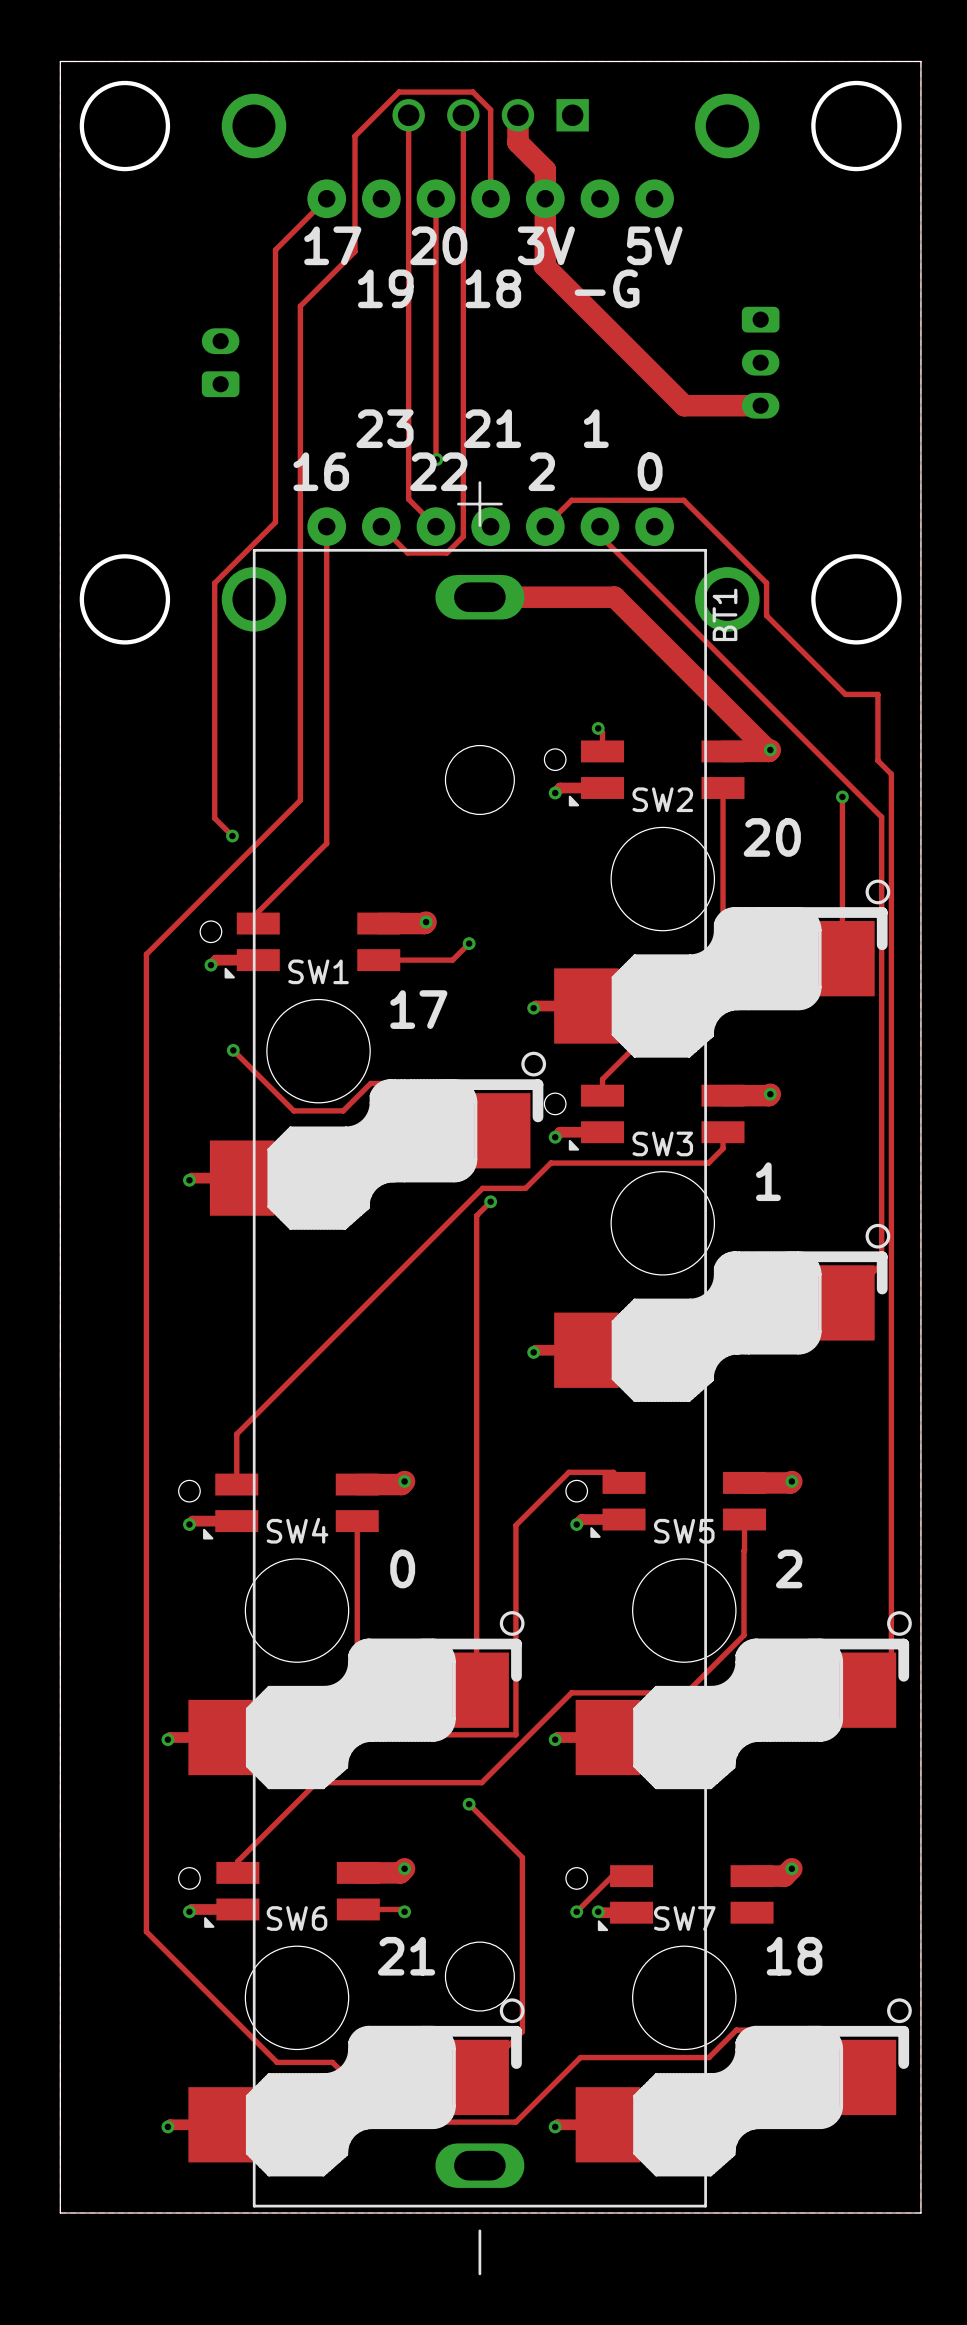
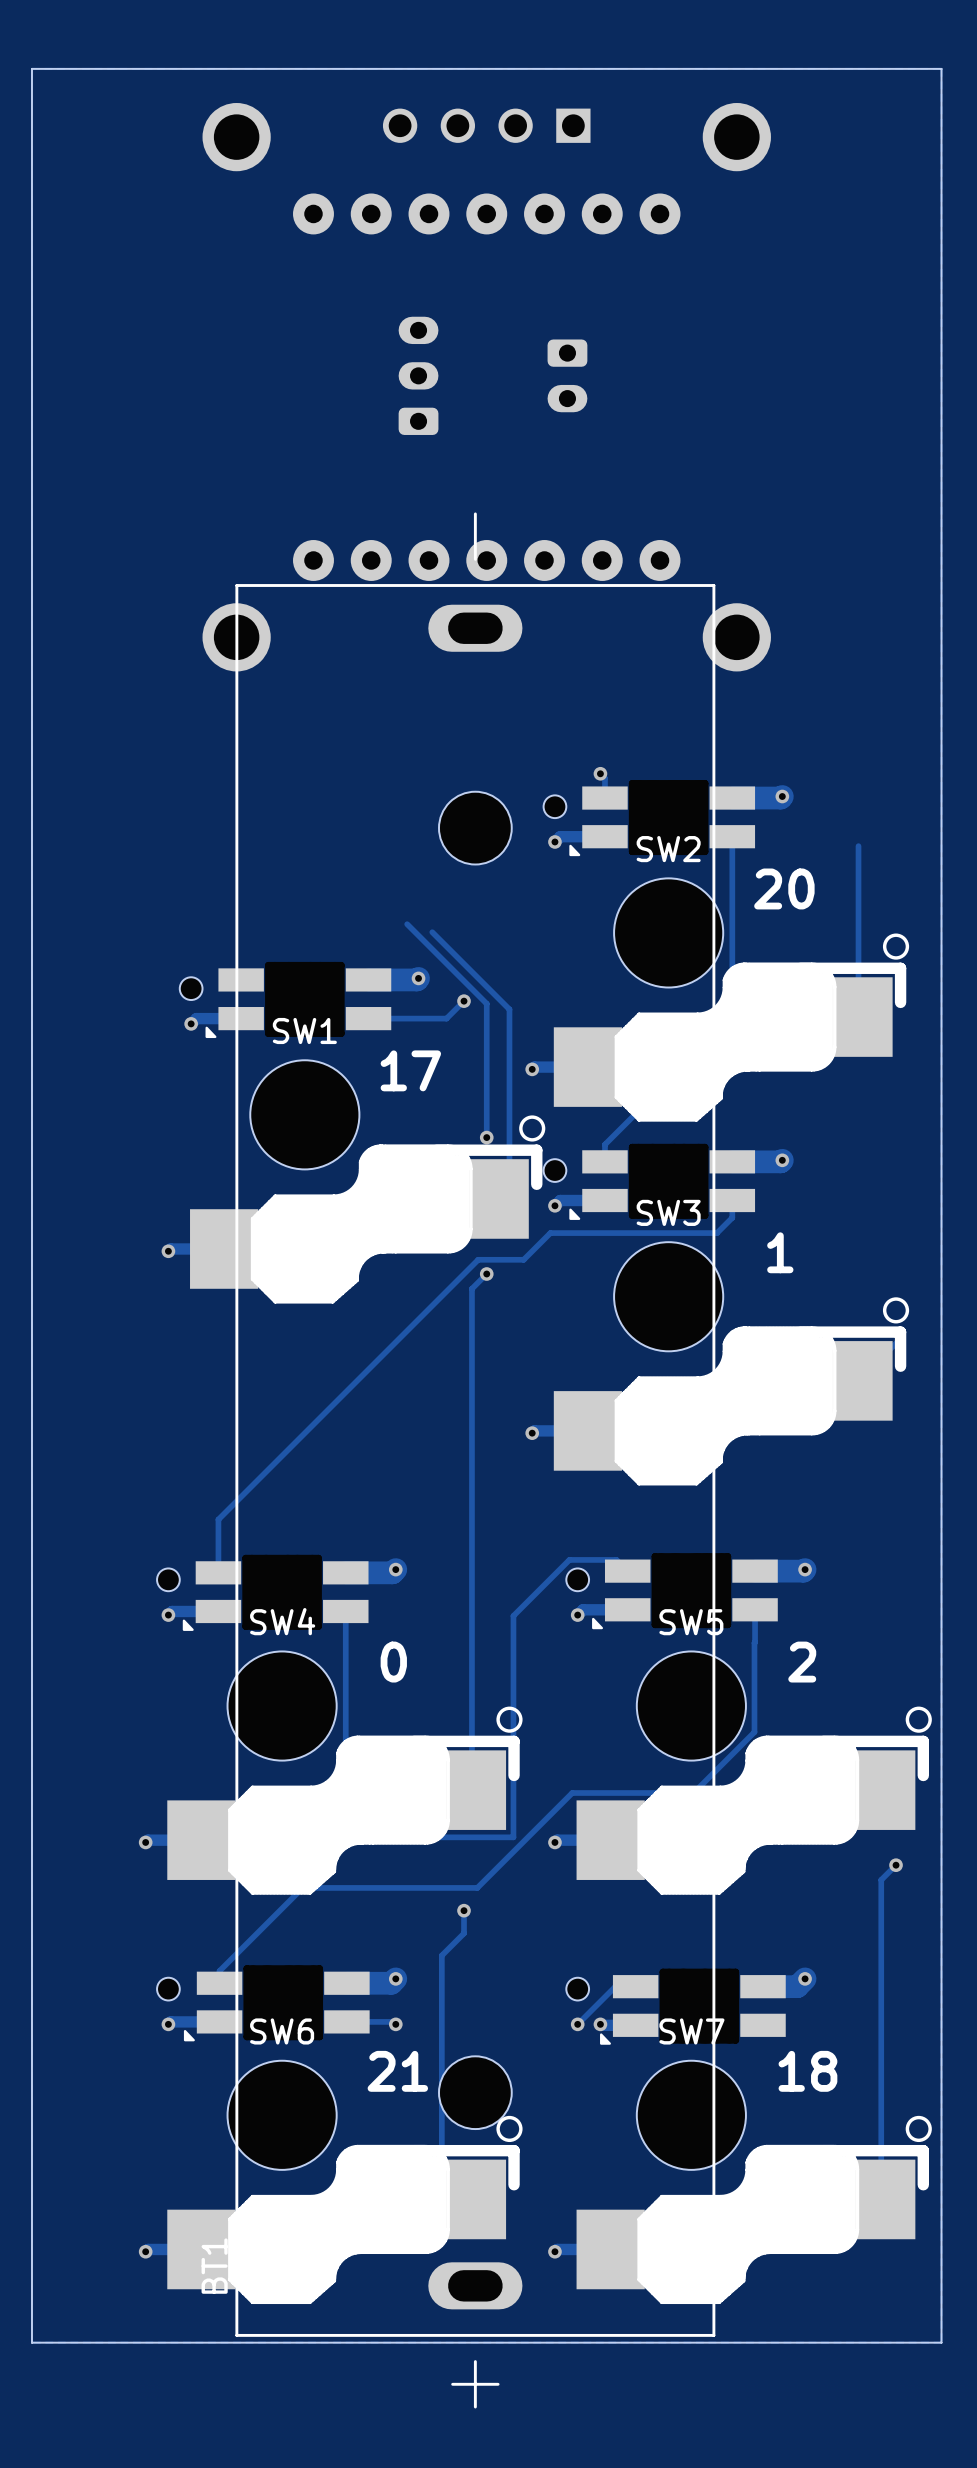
round board edge: [79, 80, 171, 172] -> none
round board edge: [811, 80, 902, 172] -> none
track: (408, 115) (408, 499) (436, 526) -> none
track: (463, 115) (463, 536) (446, 553) (407, 553) (381, 526) -> none
track: (517, 115) (517, 142) (545, 169) (544, 265) (684, 405) (760, 405) -> none
track: (326, 198) (275, 249) (275, 522) (214, 583) (214, 818) (232, 836) -> none
track: (436, 198) (436, 459) -> none
track: (490, 198) (490, 109) (472, 92) (399, 92) (355, 136) (355, 251) (300, 306) (300, 800) (146, 954) (146, 1931) (277, 2062) (332, 2062) (392, 2122) (515, 2122) (580, 2057) (709, 2057) (736, 2030) (816, 2030) (863, 2077) -> (896, 1865) (881, 1879) (881, 2199)
text: 17 (332, 245) -> none
text: 20 (438, 245) -> none
text: 3V (546, 245) -> none
text: 5V (654, 245) -> none
text: 19 (385, 288) -> none
text: 18 (493, 288) -> none
text: -G (607, 288) -> none
part rotation: 0° (220, 362) -> 180° (567, 375)
part position: (220, 362) -> (567, 375)
part rotation: 0° (760, 362) -> 180° (418, 375)
part position: (760, 362) -> (418, 375)
text: 23 (385, 428) -> none
text: 21 (492, 428) -> none
text: 1 (596, 428) -> none
via: (436, 459) -> none
text: 16 (321, 471) -> none
text: 22 (438, 471) -> none
text: 2 (541, 471) -> none
text: 0 (650, 471) -> none
track: (326, 526) (326, 843) (258, 911) (258, 923) -> none
track: (545, 526) (571, 500) (683, 500) (766, 583) (766, 615) (845, 694) (877, 694) (877, 760) (891, 774) (891, 1662) -> none
track: (599, 526) (599, 535) (881, 817) (881, 1263) -> none
round board edge: [79, 554, 171, 645] -> none
round board edge: [811, 554, 902, 645] -> none
track: (479, 597) (614, 597) (768, 751) -> none
via: (842, 796) -> none
via: (232, 836) -> none
track: none -> (407, 924) (486, 1003) (486, 1137)
track: (233, 1050) (293, 1110) (343, 1110) (370, 1083) (450, 1083) (498, 1130) -> (432, 932) (509, 1009) (509, 1184) (494, 1198)
via: (233, 1050) -> none
via: none -> (486, 1137)
BT1 rotation: 0° (479, 1378) -> 180° (475, 1460)
via: none -> (896, 1865)
track: (469, 1804) (522, 1857) (522, 2031) (476, 2077) -> (464, 1910) (464, 1933) (441, 1955) (441, 2169)

